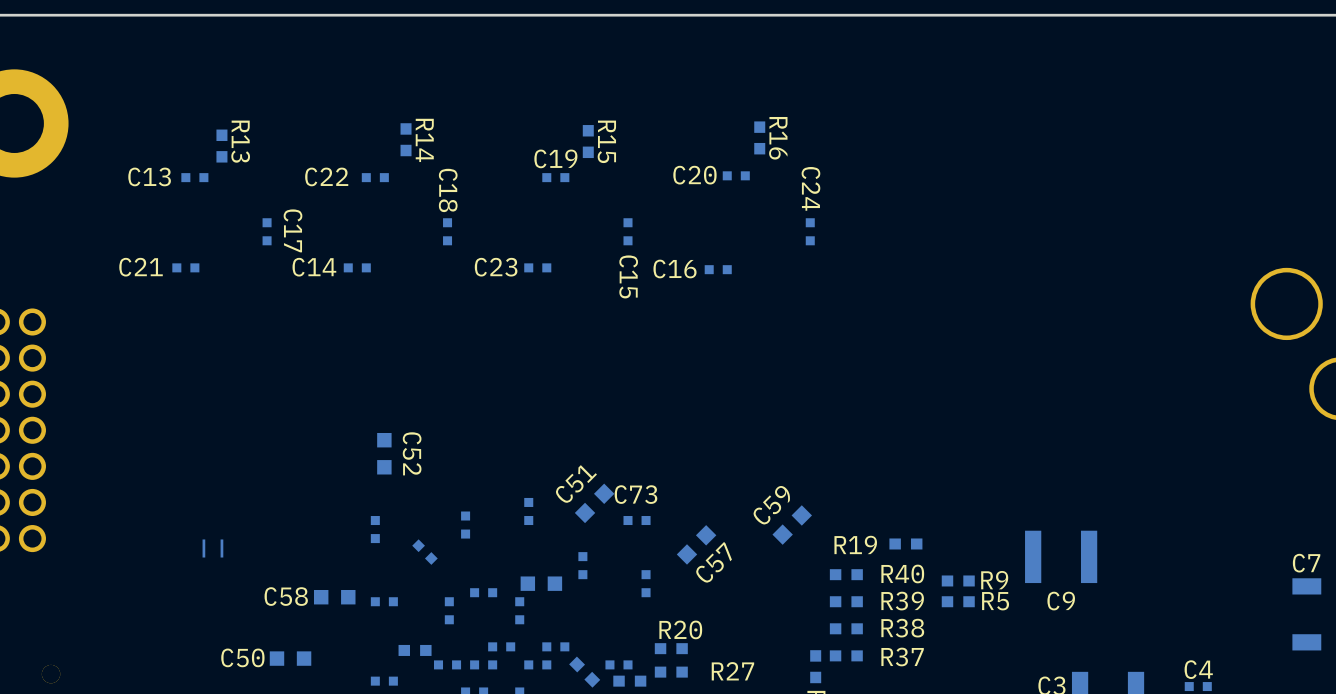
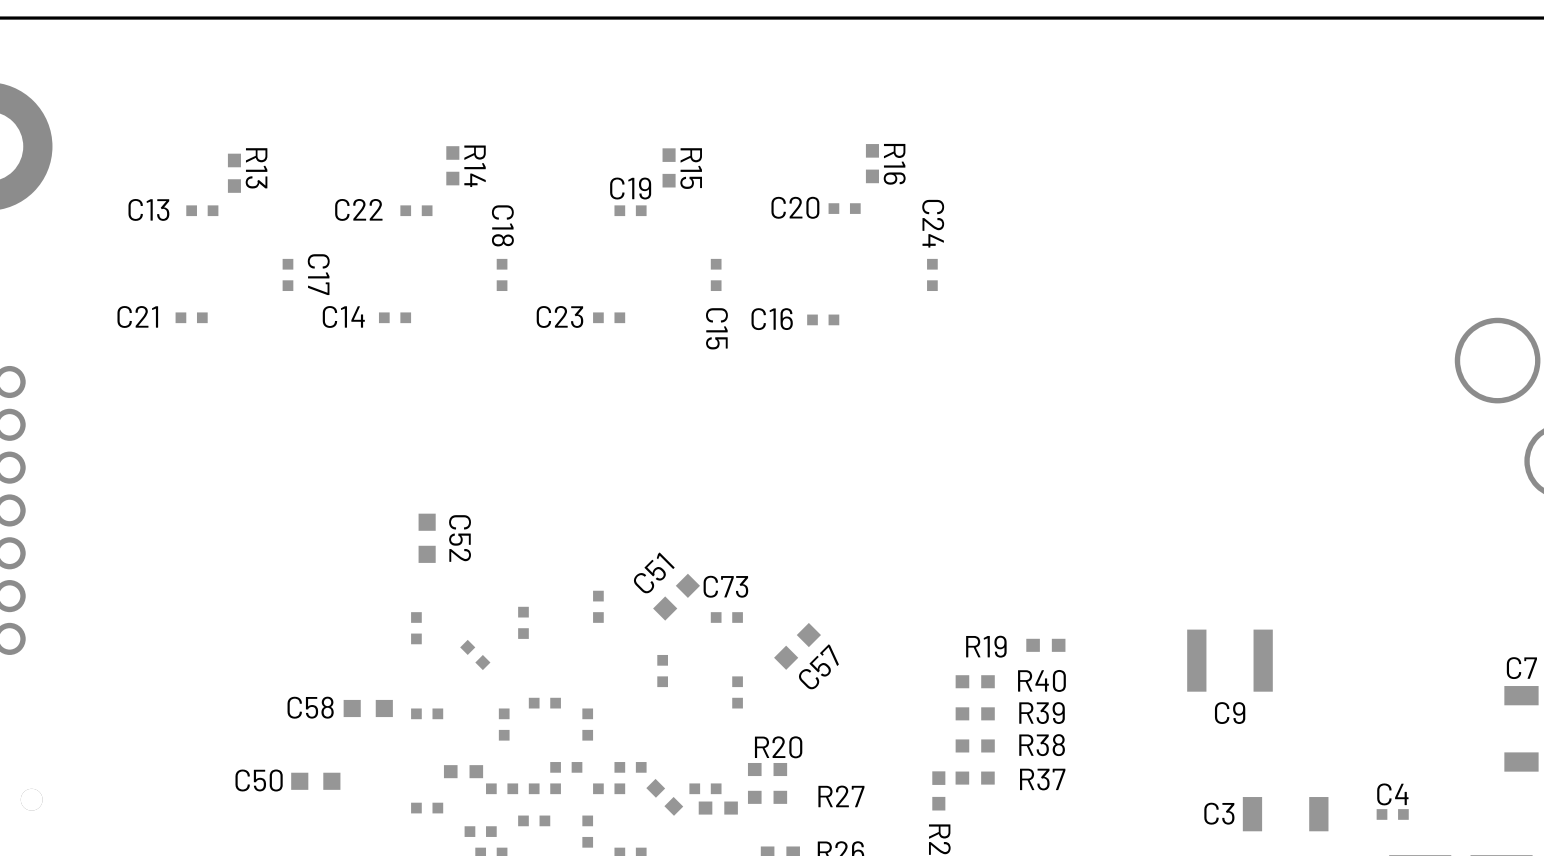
C59: (792, 525) -> none
part: (203, 548) -> none
part: (221, 548) -> none
R9: (958, 580) -> none
part: (541, 583) -> none
R5: (958, 601) -> none

